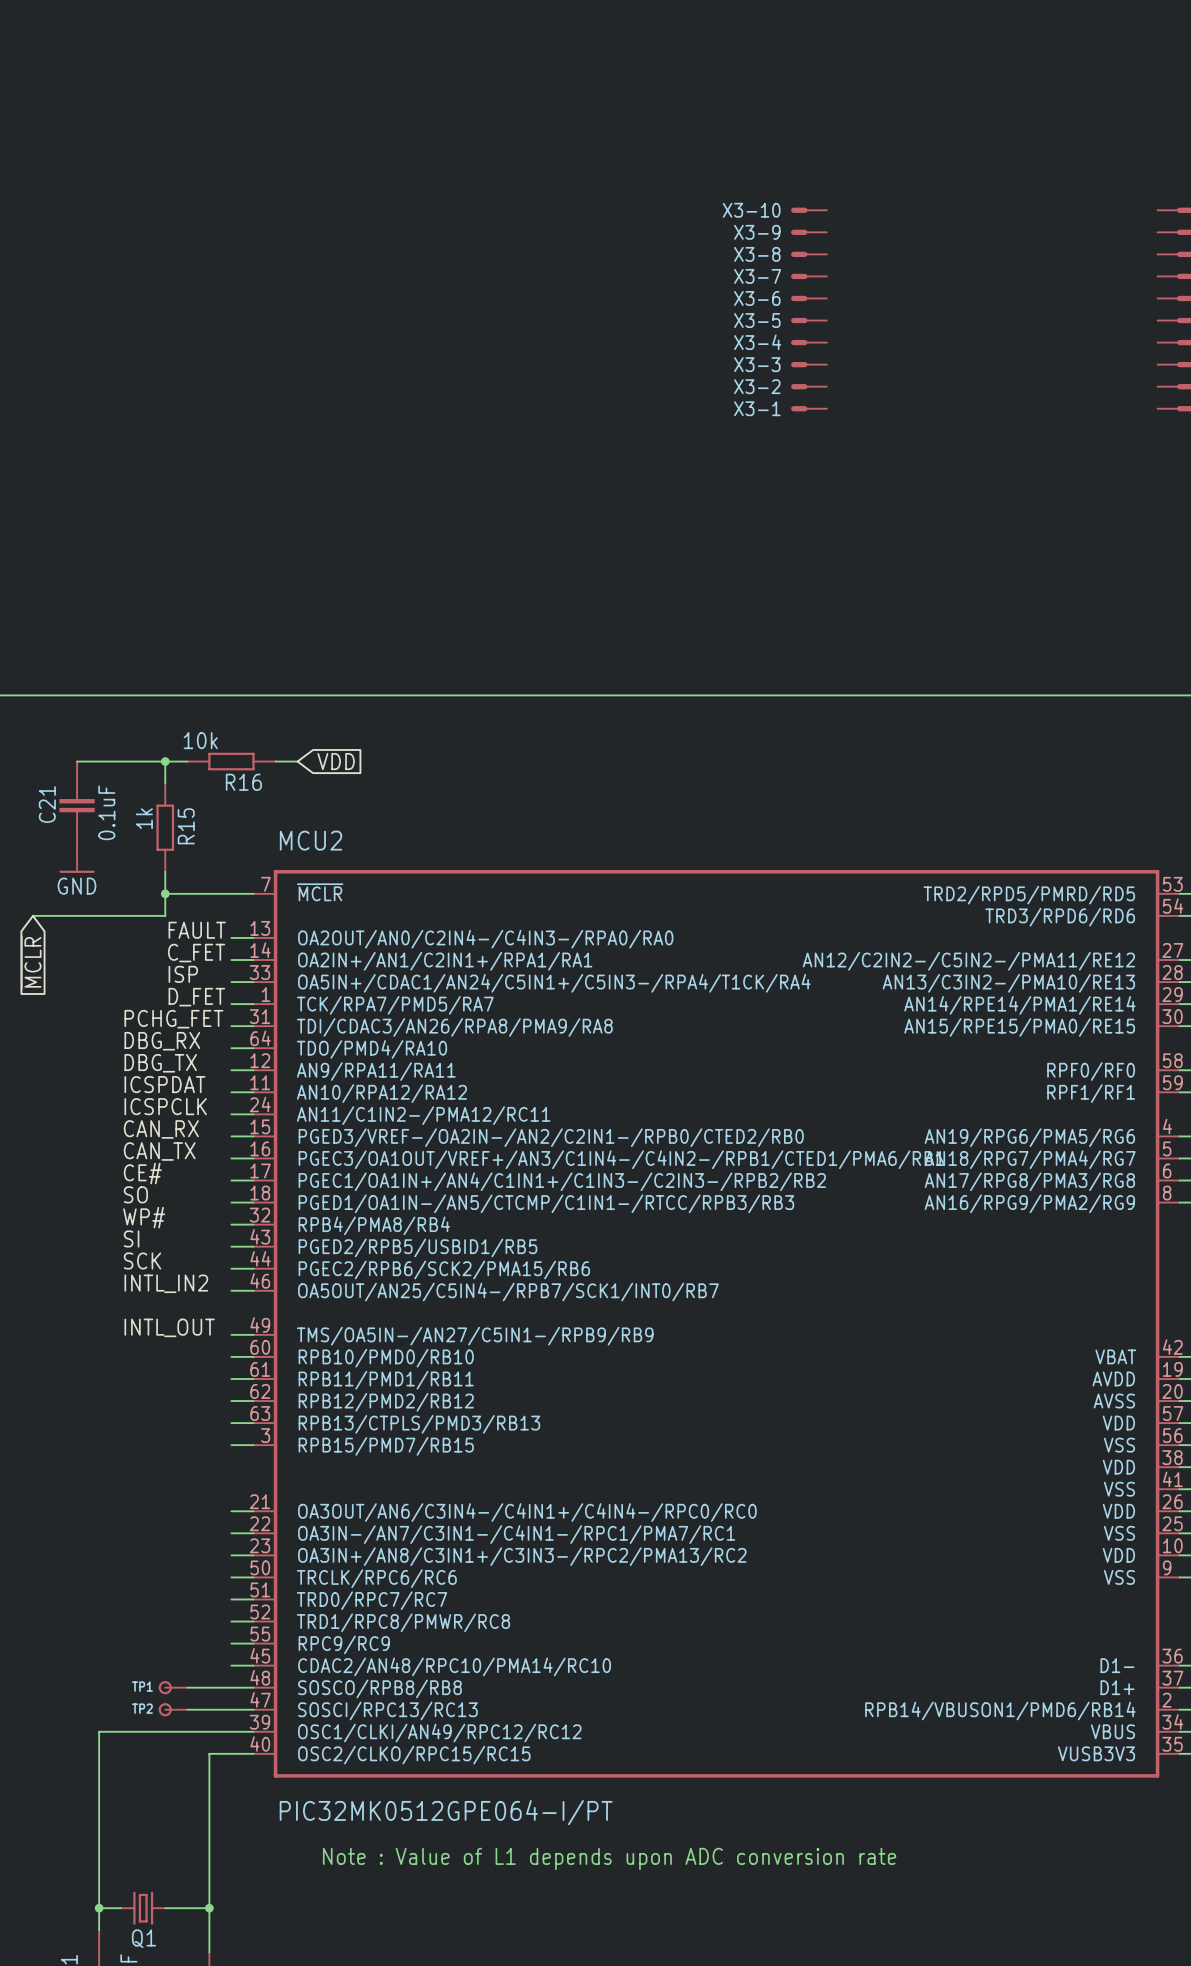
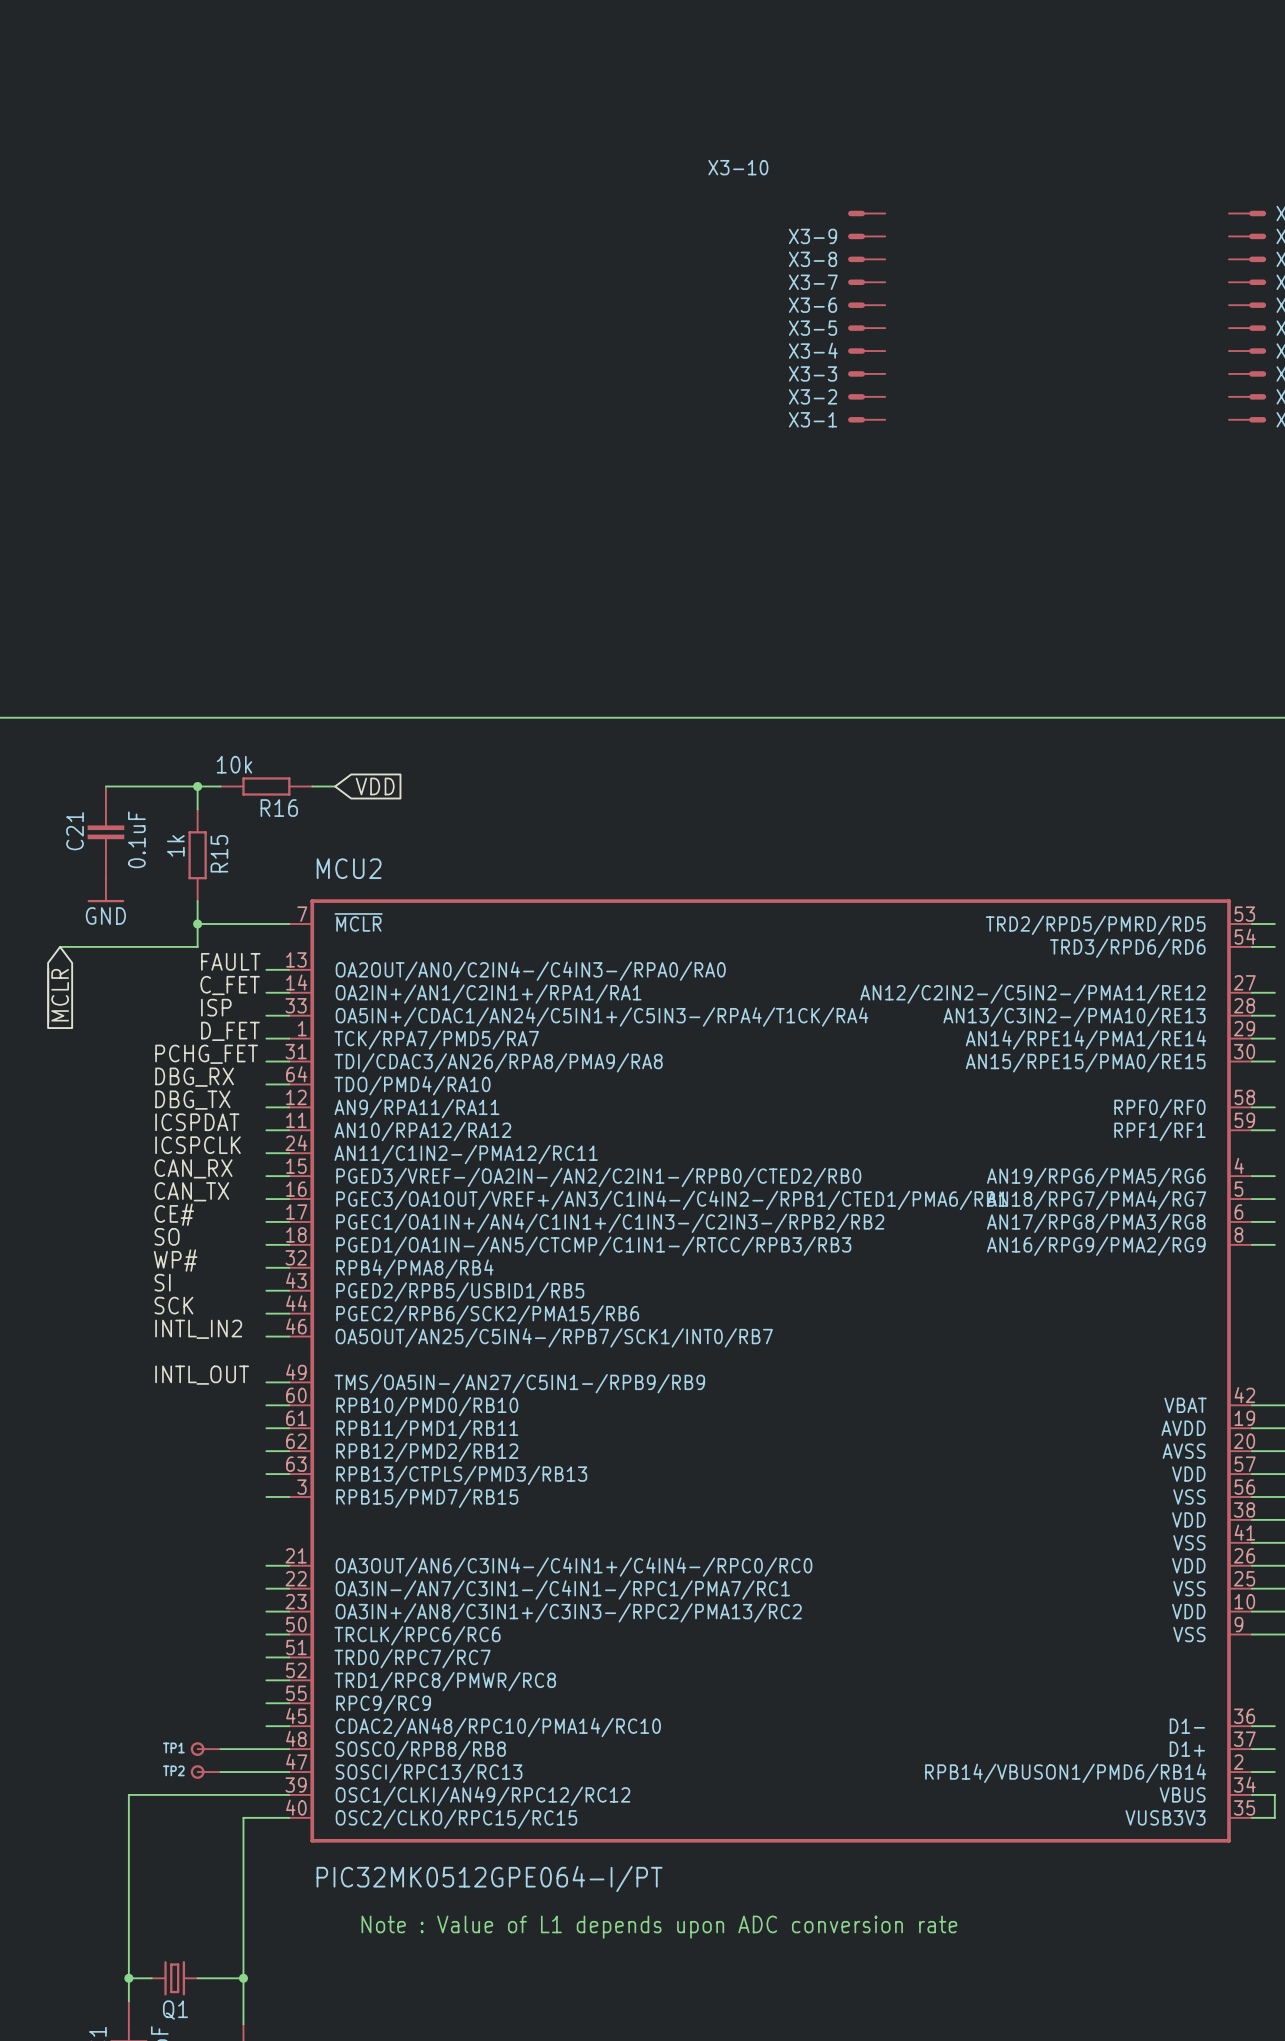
X3-10 name position: X3-10 (751, 210) -> X3-10 (738, 167)

